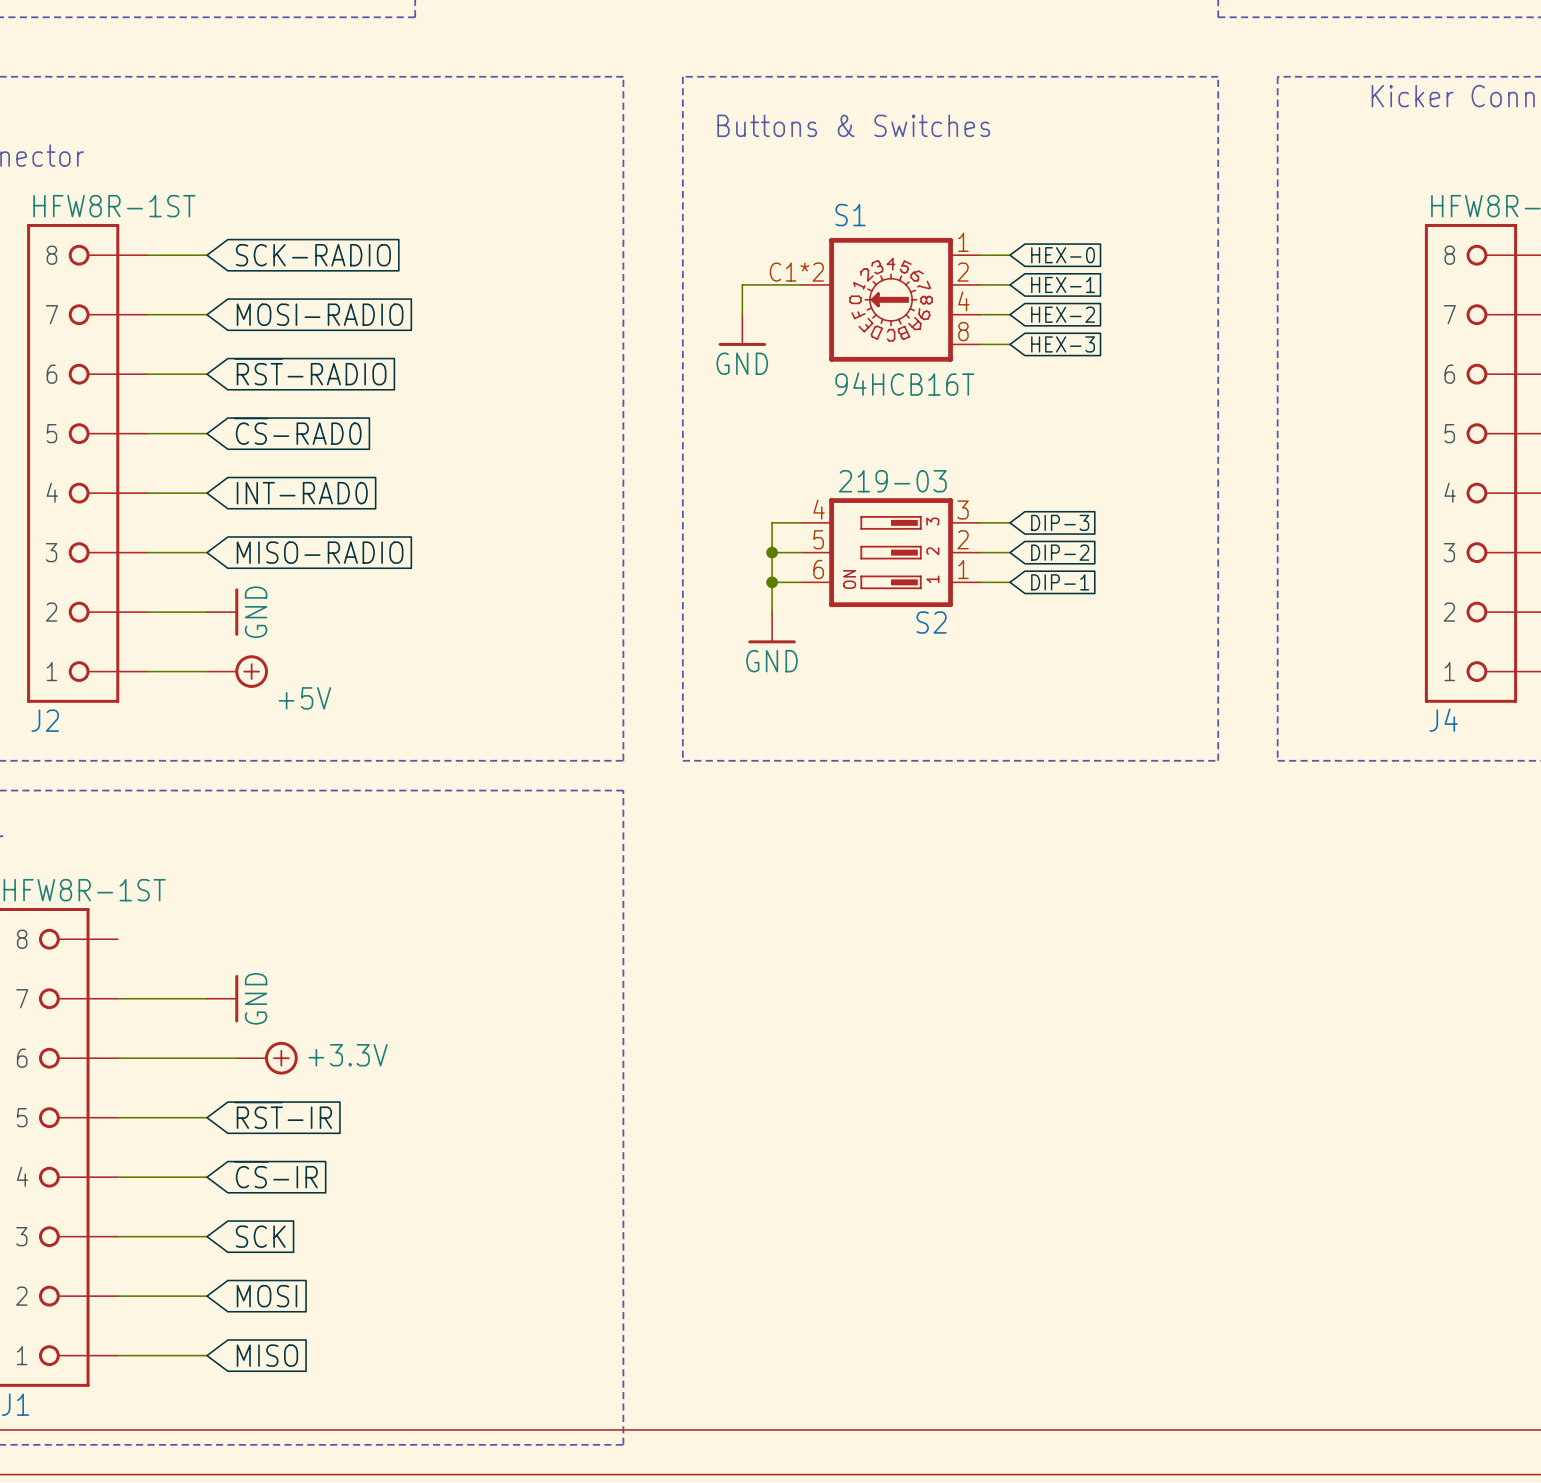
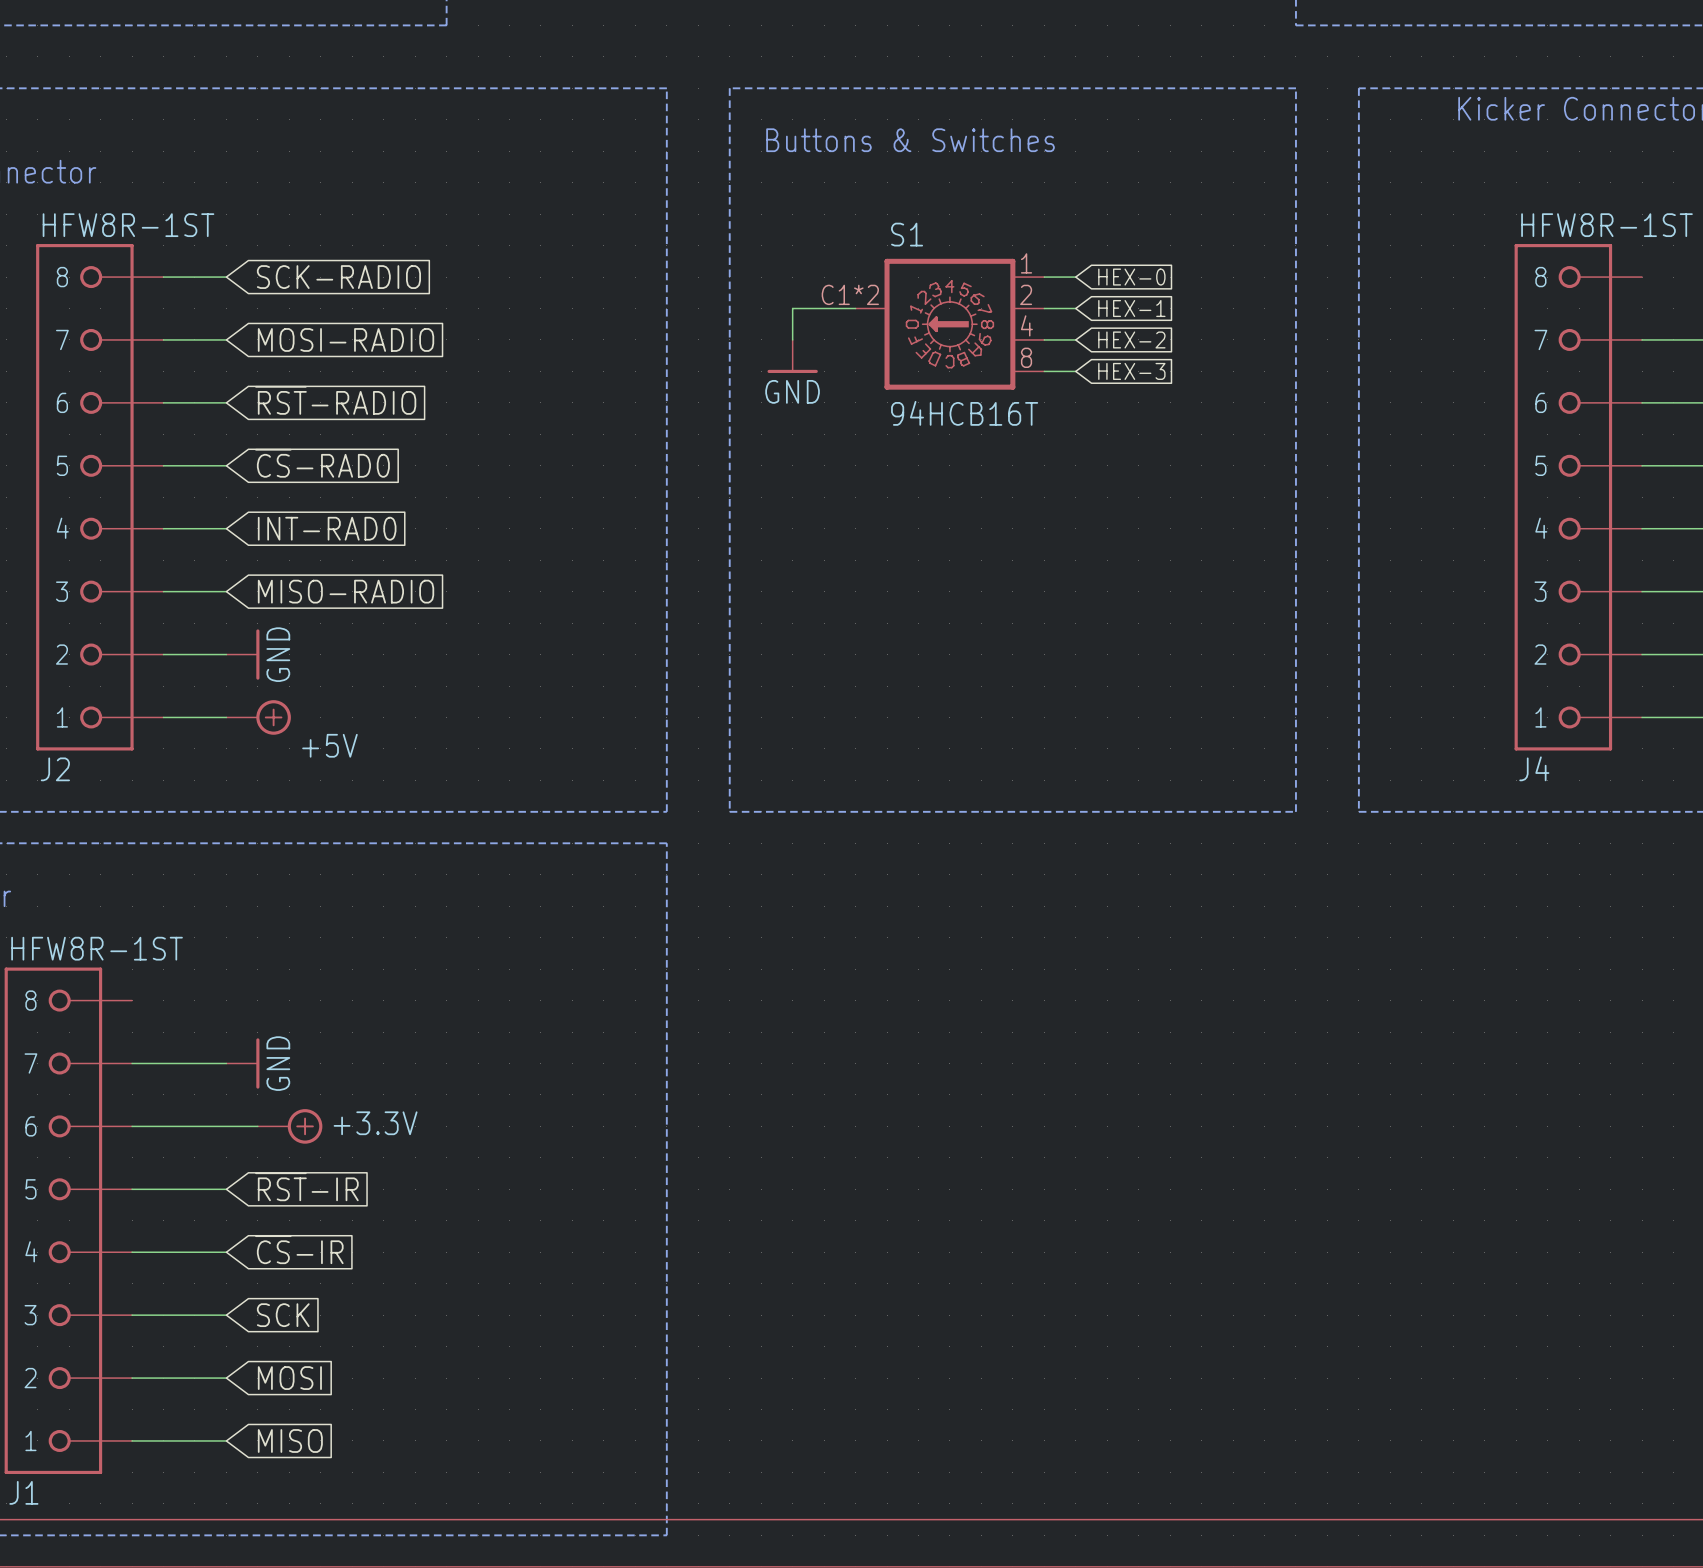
wire: (801, 522) (772, 522) (772, 612) -> none
wire: (980, 522) (1010, 522) -> none
global label: DIP-3 (1060, 522) -> none
wire: (772, 552) (801, 552) -> none
junction: (772, 552) -> none
S2: 219-03 (891, 552) -> none
wire: (980, 552) (1010, 552) -> none
global label: DIP-2 (1060, 552) -> none
wire: (772, 582) (801, 582) -> none
junction: (772, 582) -> none
wire: (980, 582) (1010, 582) -> none
global label: DIP-1 (1060, 582) -> none
power symbol: GND (772, 627) -> none

